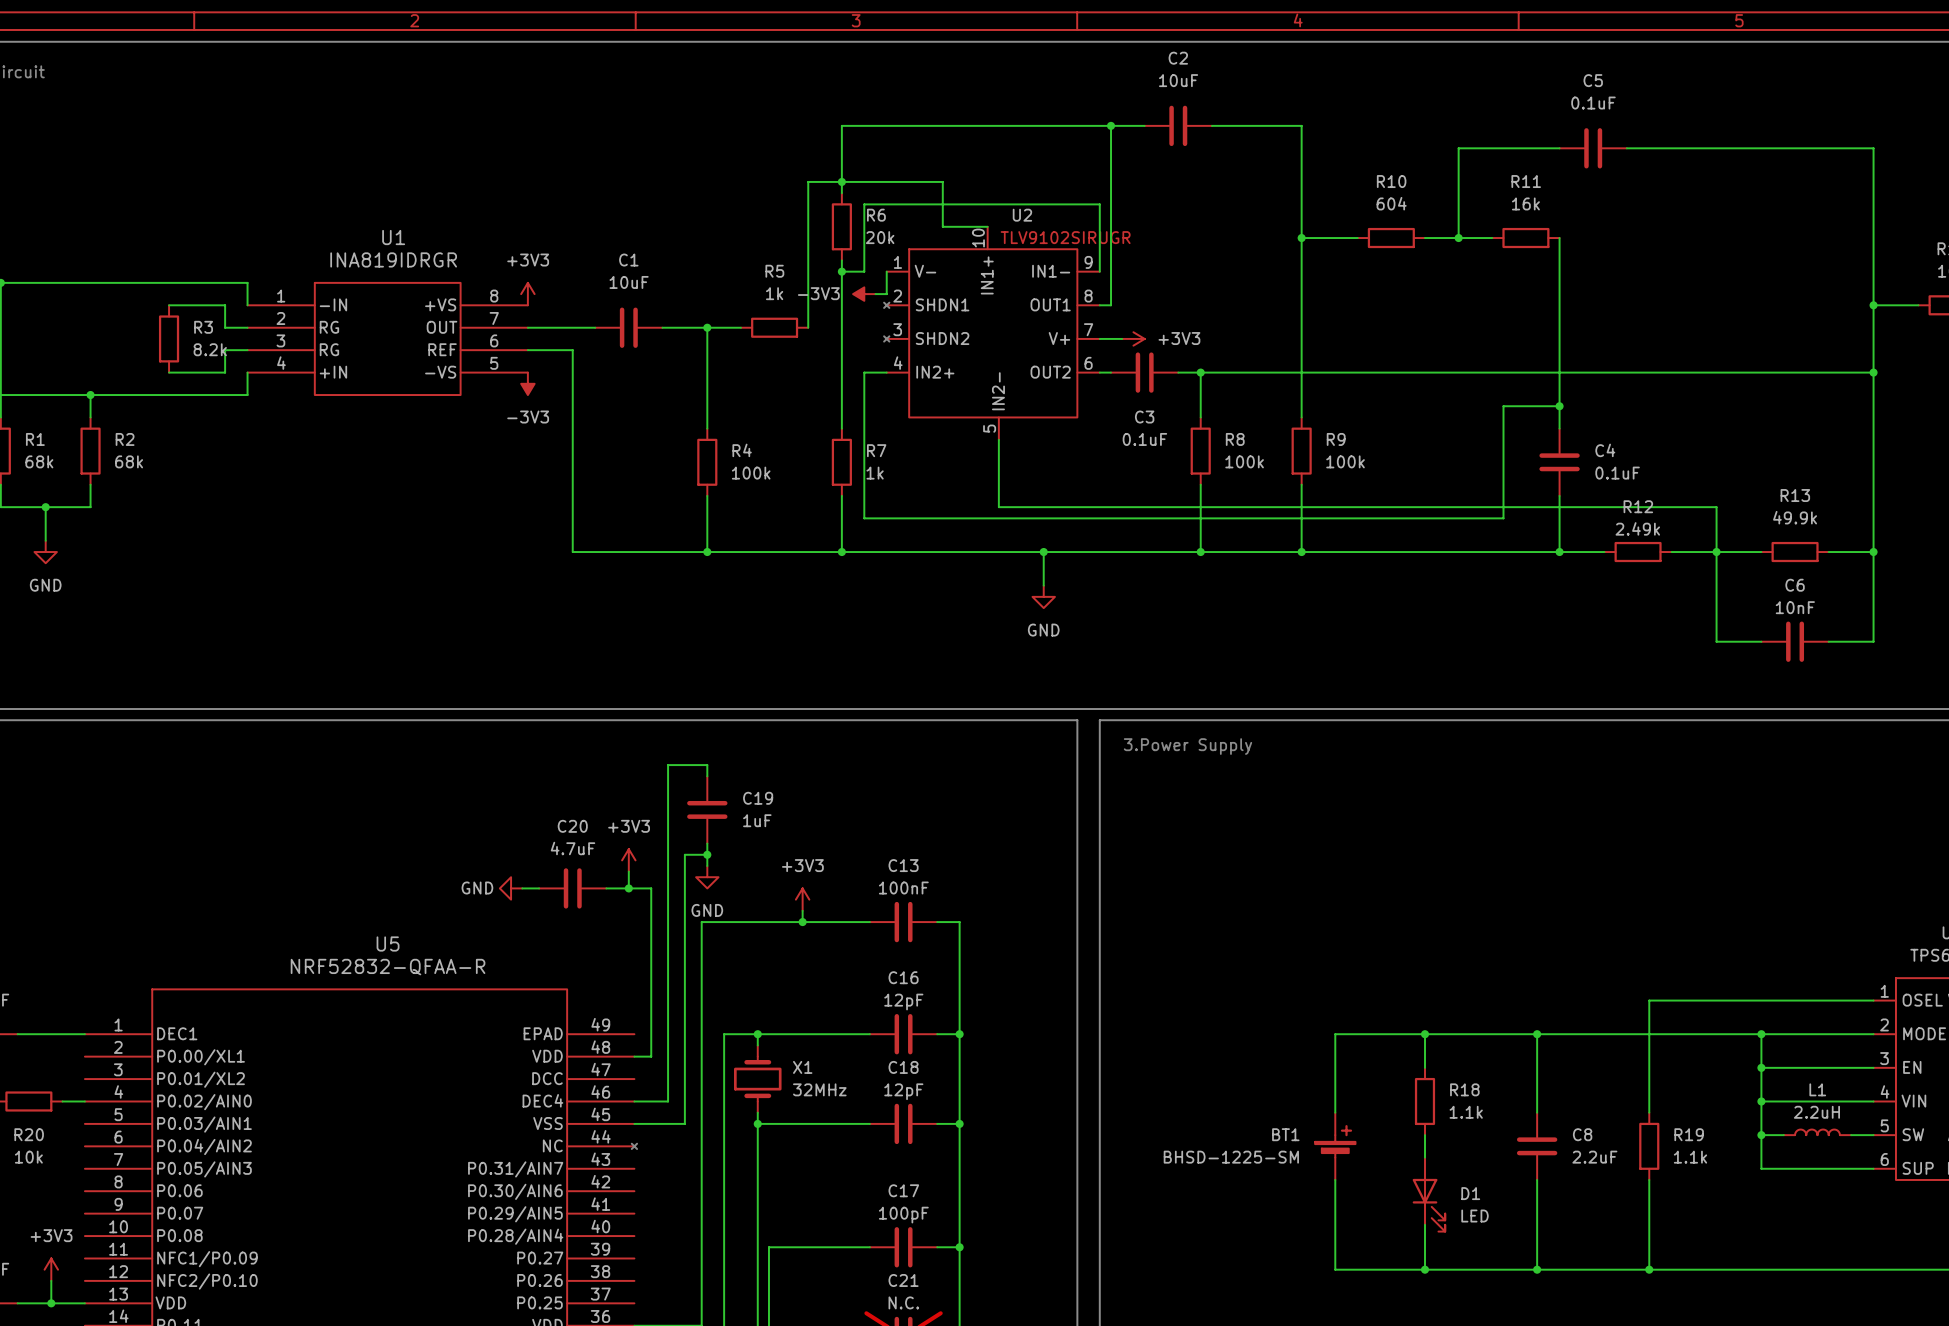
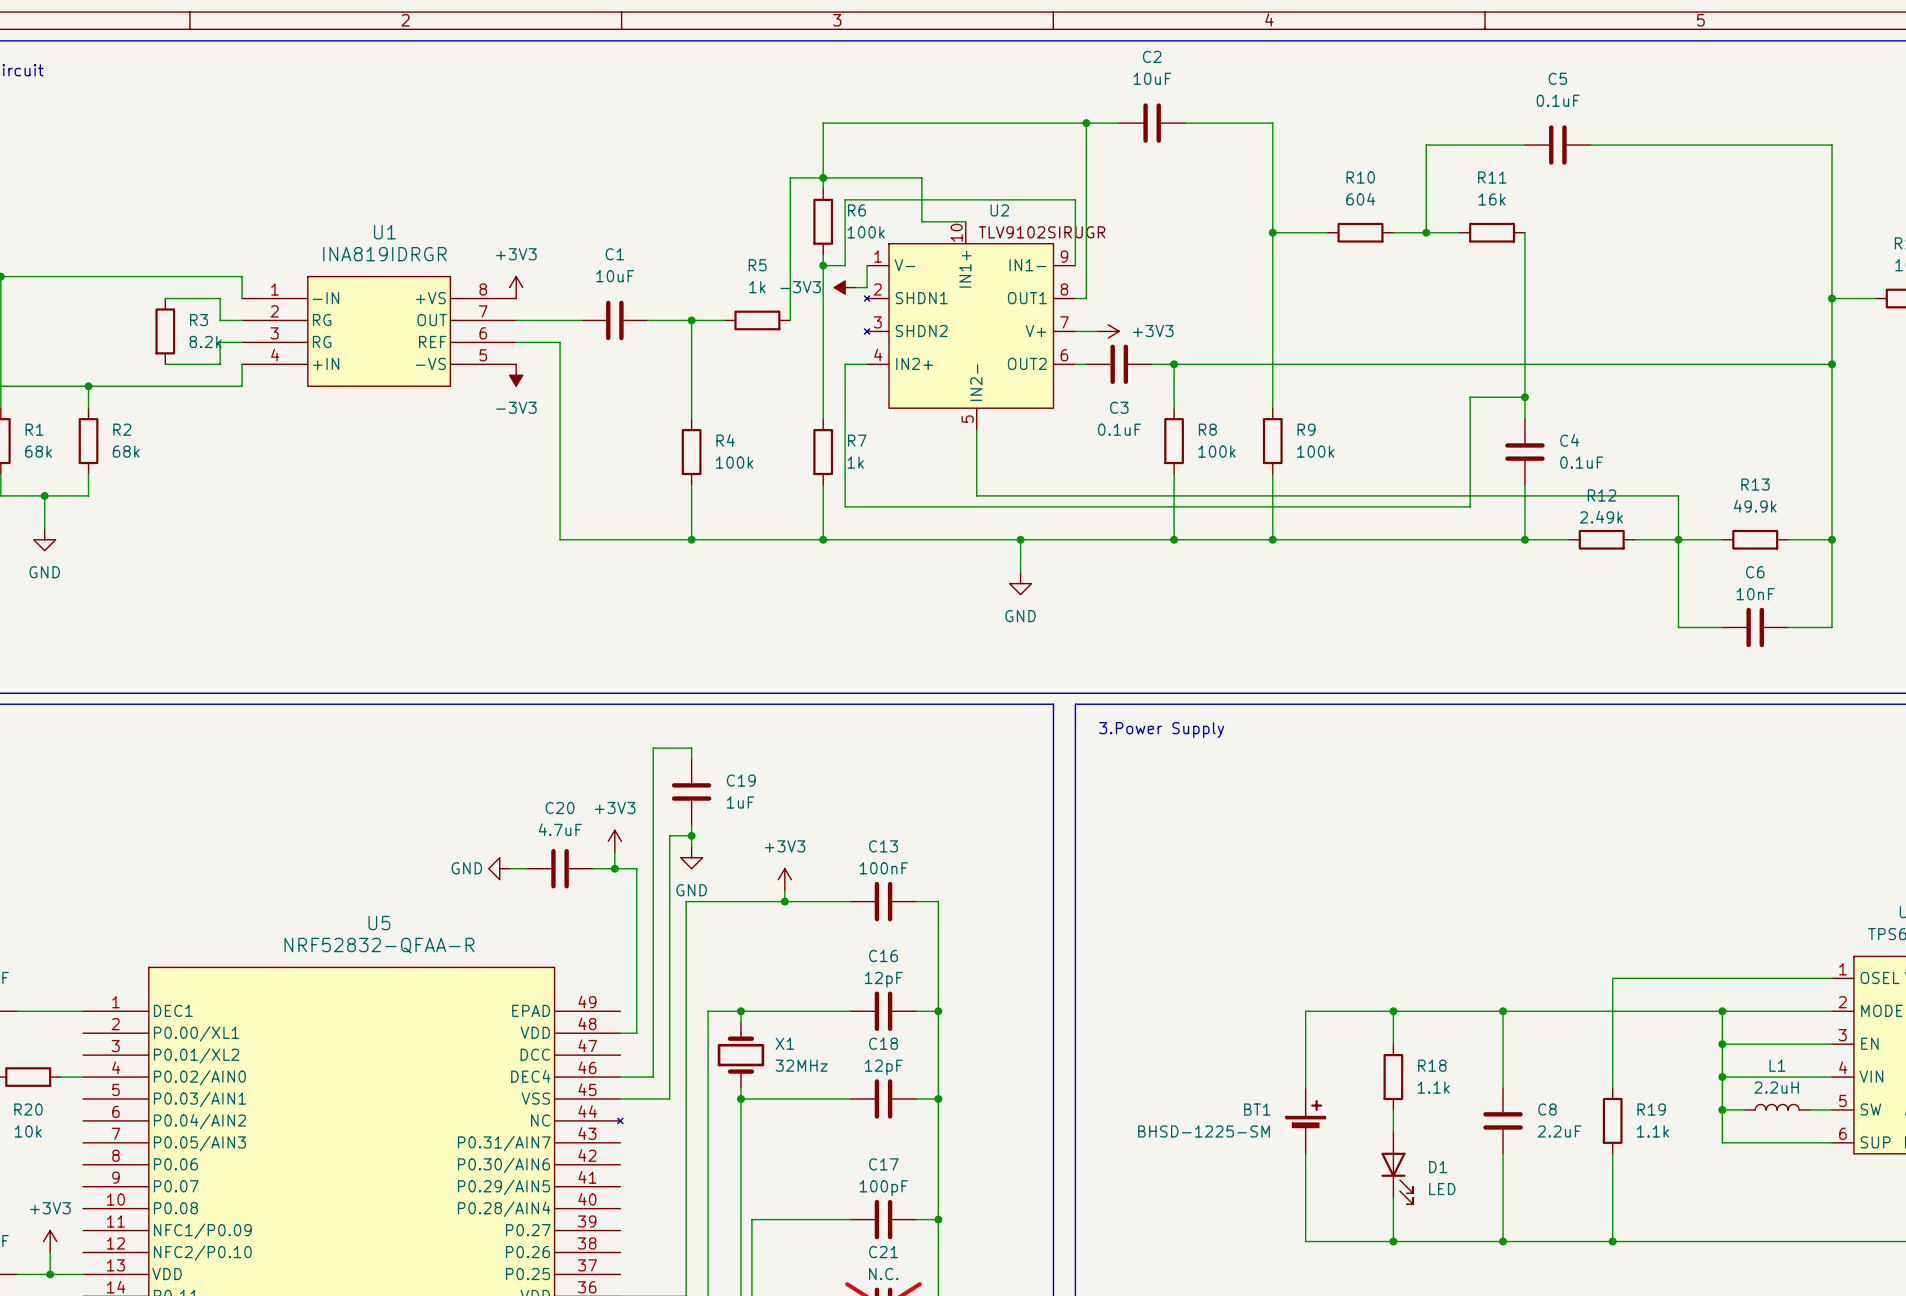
R6 value: 20k (880, 237) -> 100k (866, 232)

